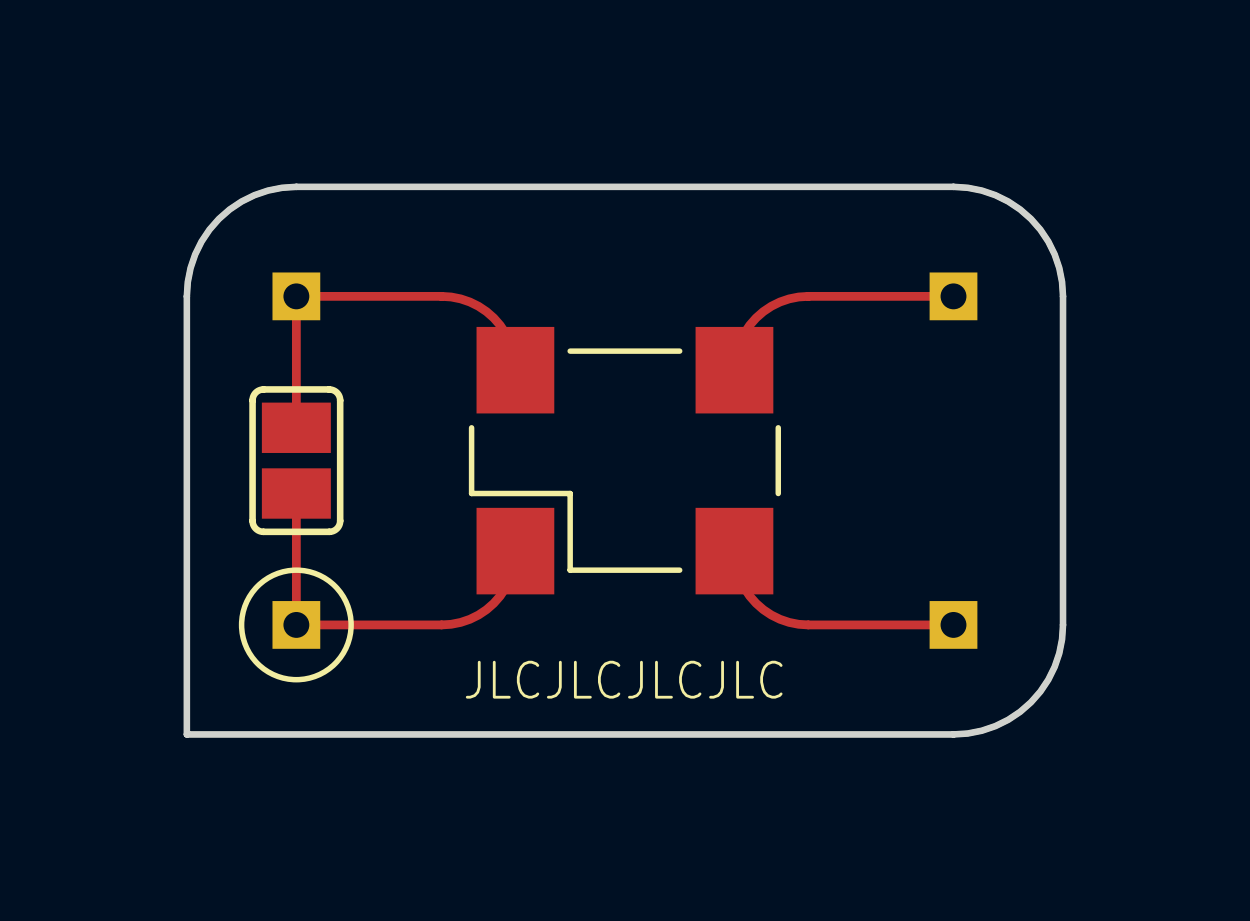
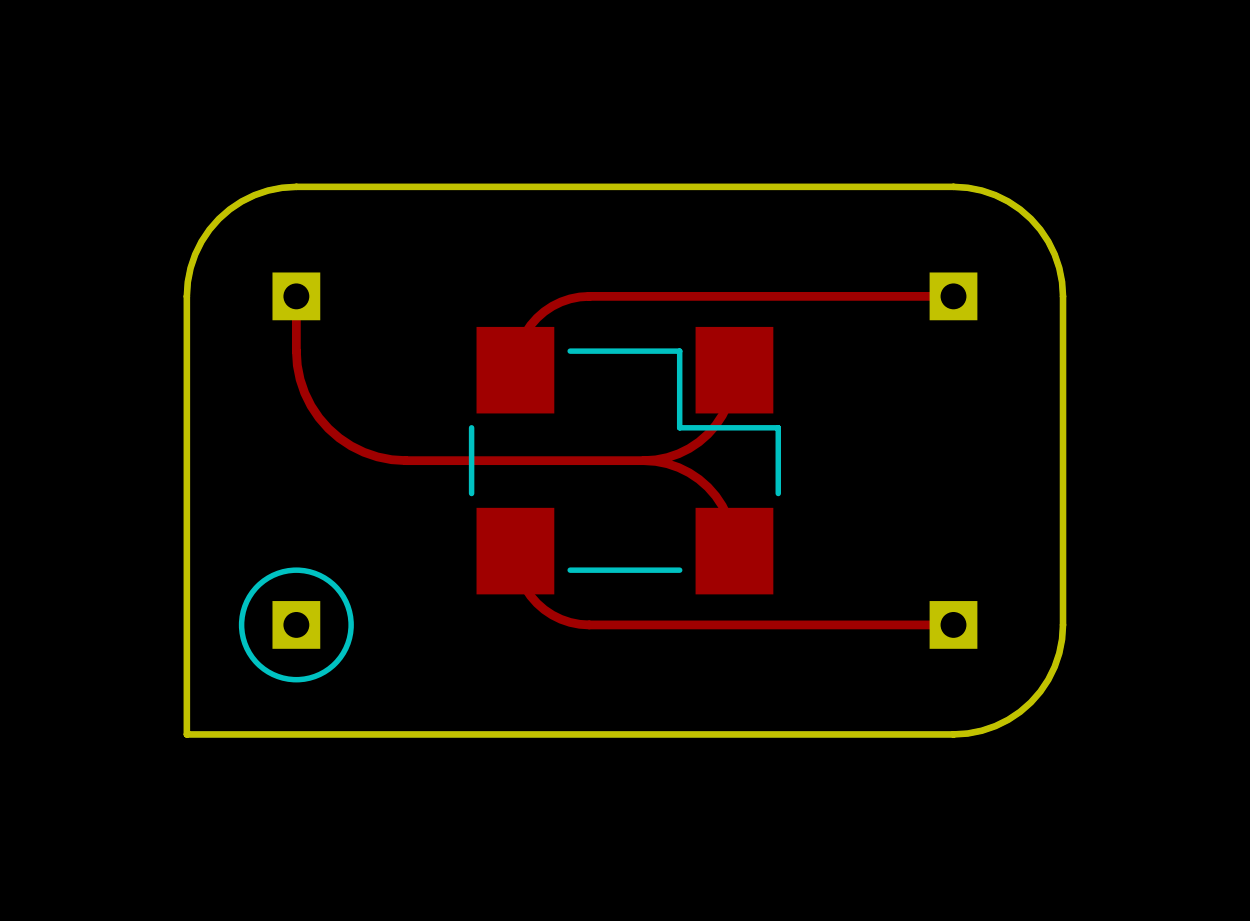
top track: (296, 296) (441, 296) (460, 298) (478, 306) (500, 325) (512, 351) (515, 370) -> none
top track: (808, 296) (780, 301) (756, 317) (740, 341) (734, 370) -> (808, 296) (589, 296) (570, 298) (552, 306) (530, 325) (517, 351) (515, 370)
top track: (296, 351) (296, 427) -> (296, 351) (300, 379) (304, 393) (319, 417) (339, 438) (363, 452) (377, 456) (405, 460) (643, 460)
top track: none -> (734, 370) (731, 393) (727, 404) (722, 415) (707, 434) (699, 441) (678, 453) (667, 457) (643, 460)
part: (296, 460) -> none
part rotation: 0° (624, 460) -> 180° (624, 460)
top track: none -> (643, 460) (667, 463) (678, 467) (689, 472) (707, 487) (715, 496) (727, 516) (733, 539) (734, 551)
top track: (296, 493) (296, 624) (441, 624) (460, 622) (478, 615) (500, 596) (509, 579) (515, 551) -> none
top track: (734, 551) (740, 579) (756, 603) (780, 619) (808, 624) -> (515, 551) (521, 579) (530, 596) (544, 609) (570, 622) (589, 624) (808, 624)
text: JLCJLCJLCJLC (624, 679) -> none

